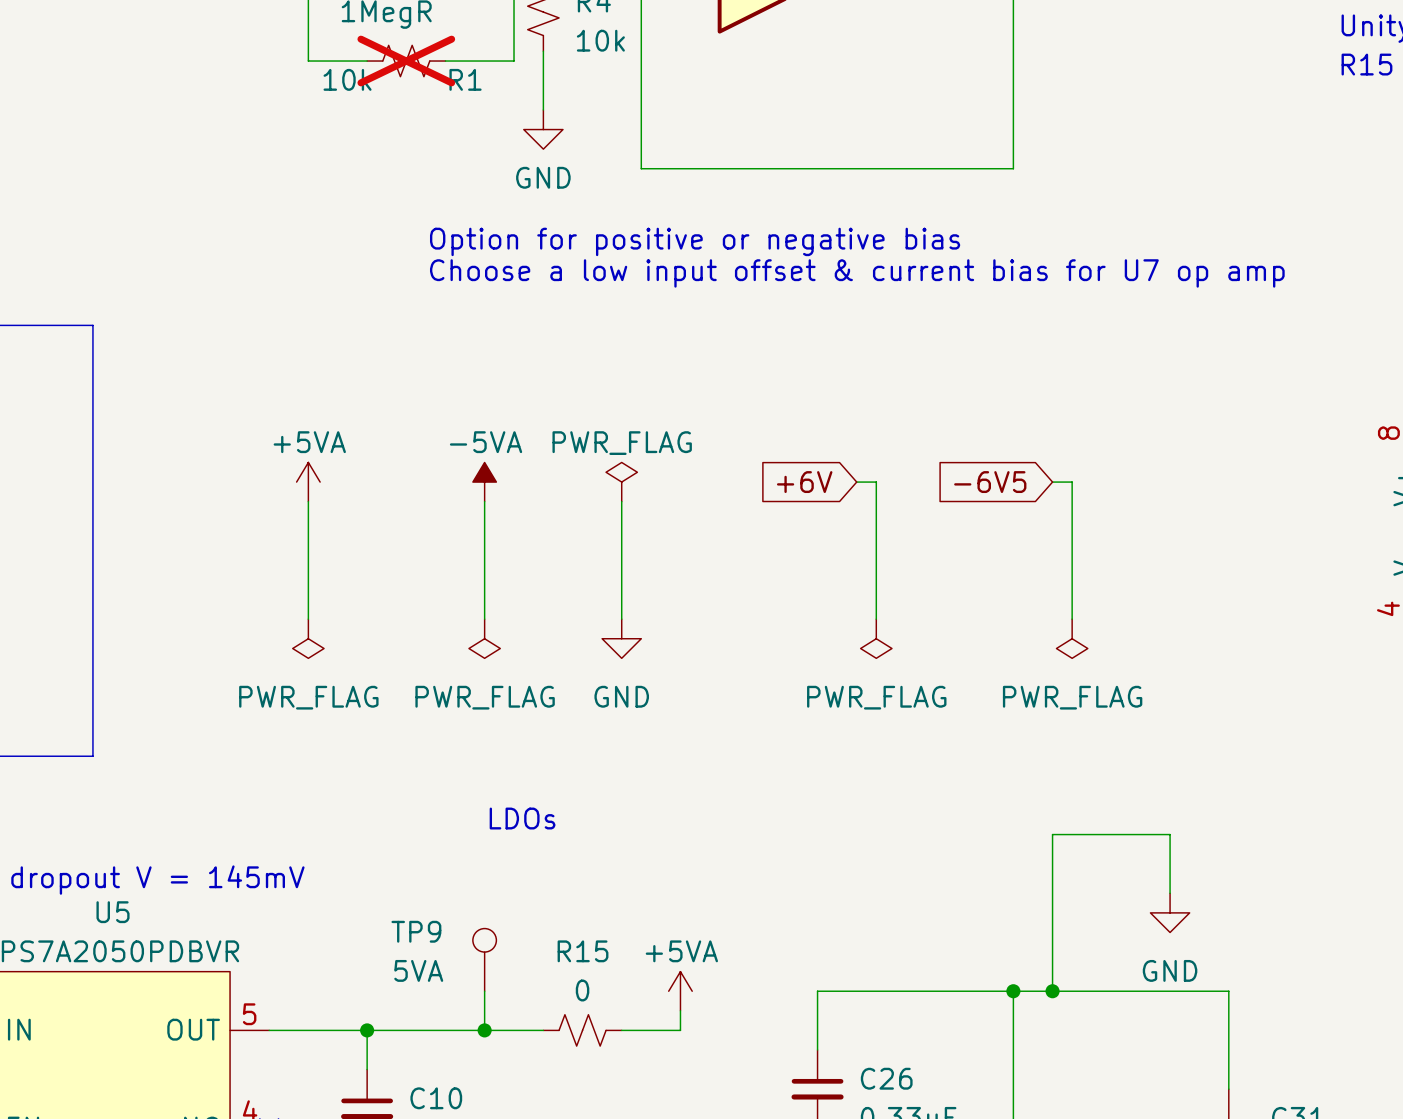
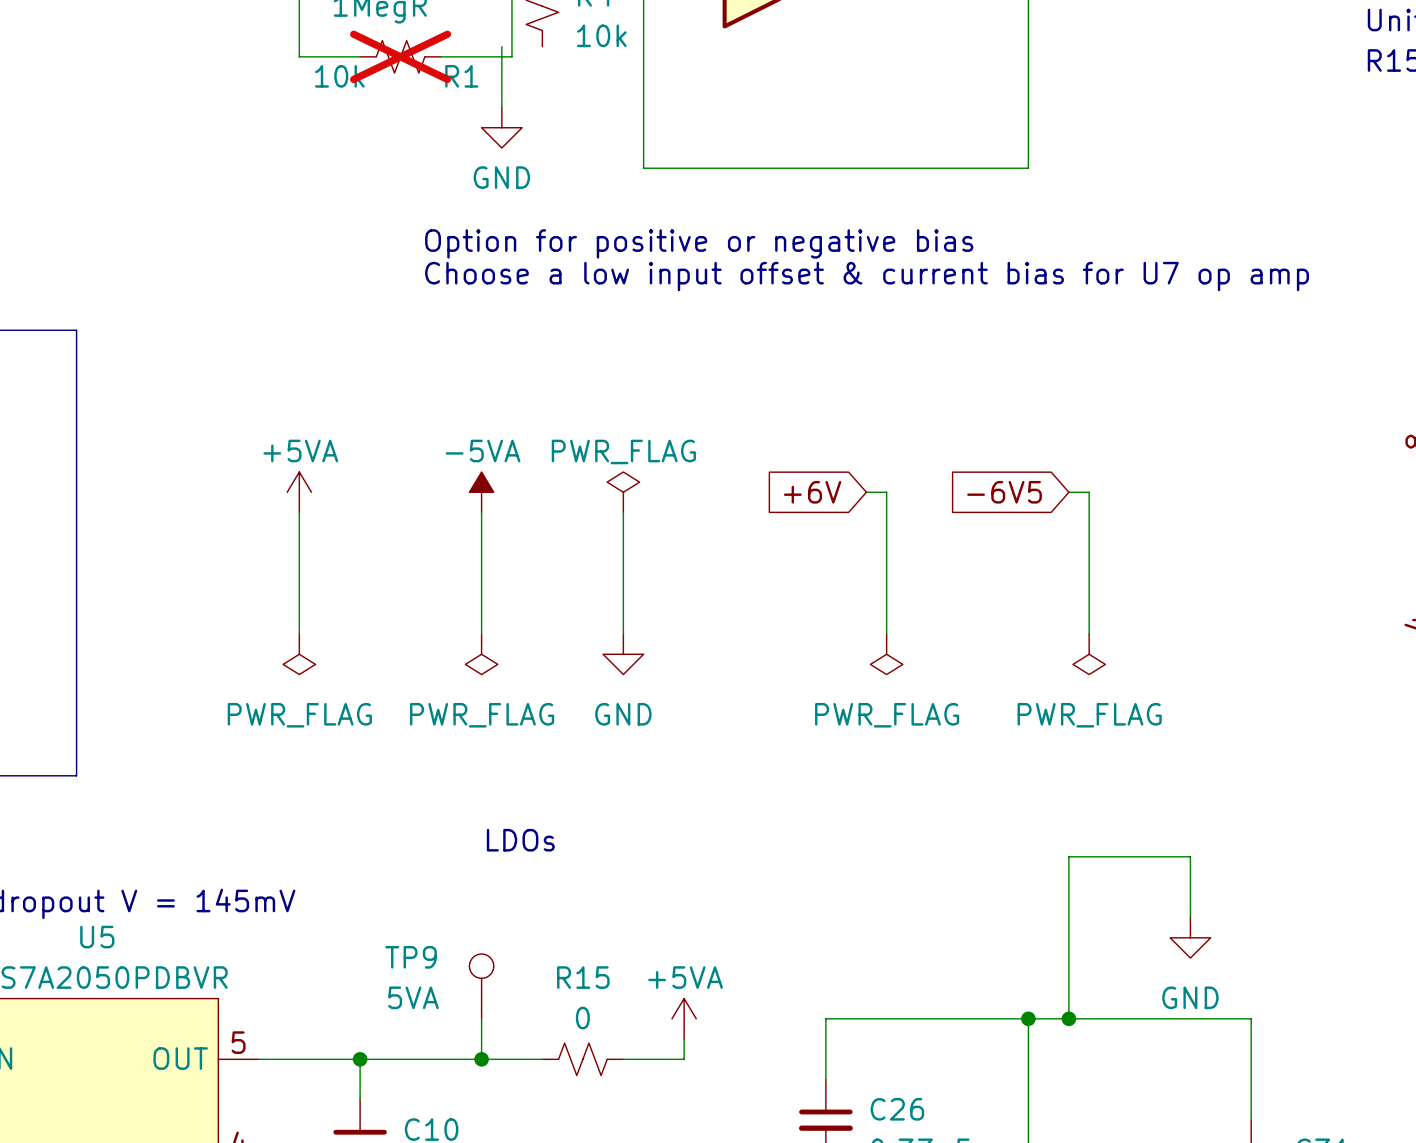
wire: (543, 51) (543, 109) -> (501, 46) (501, 107)
power symbol position: GND (543, 129) -> GND (501, 127)

